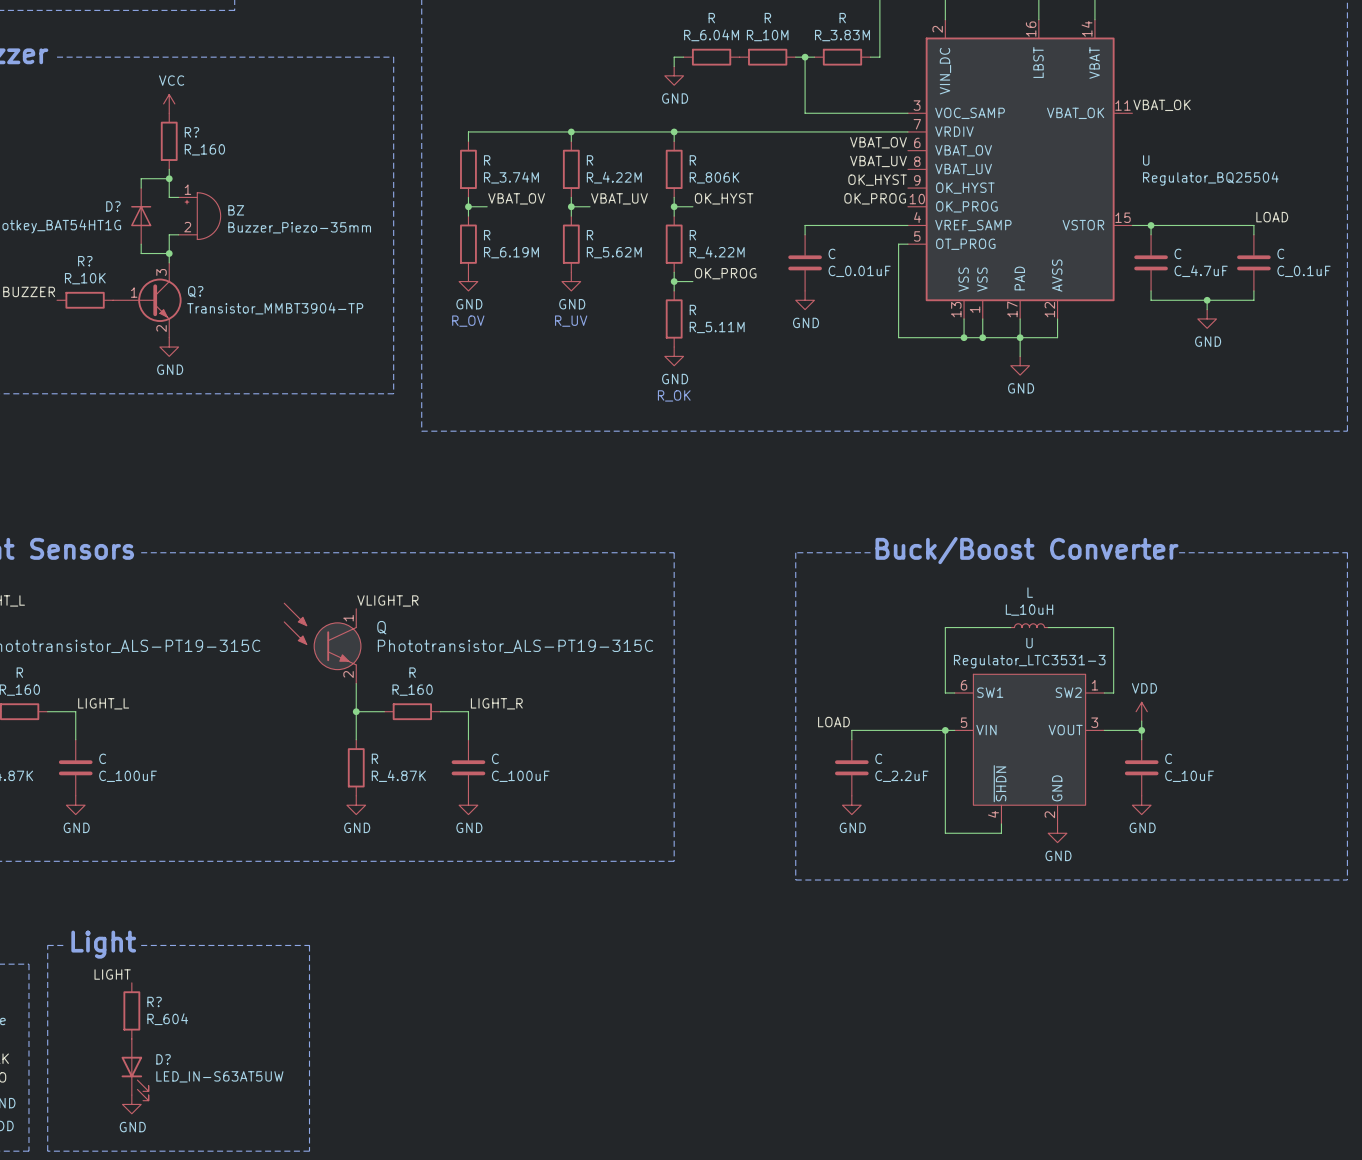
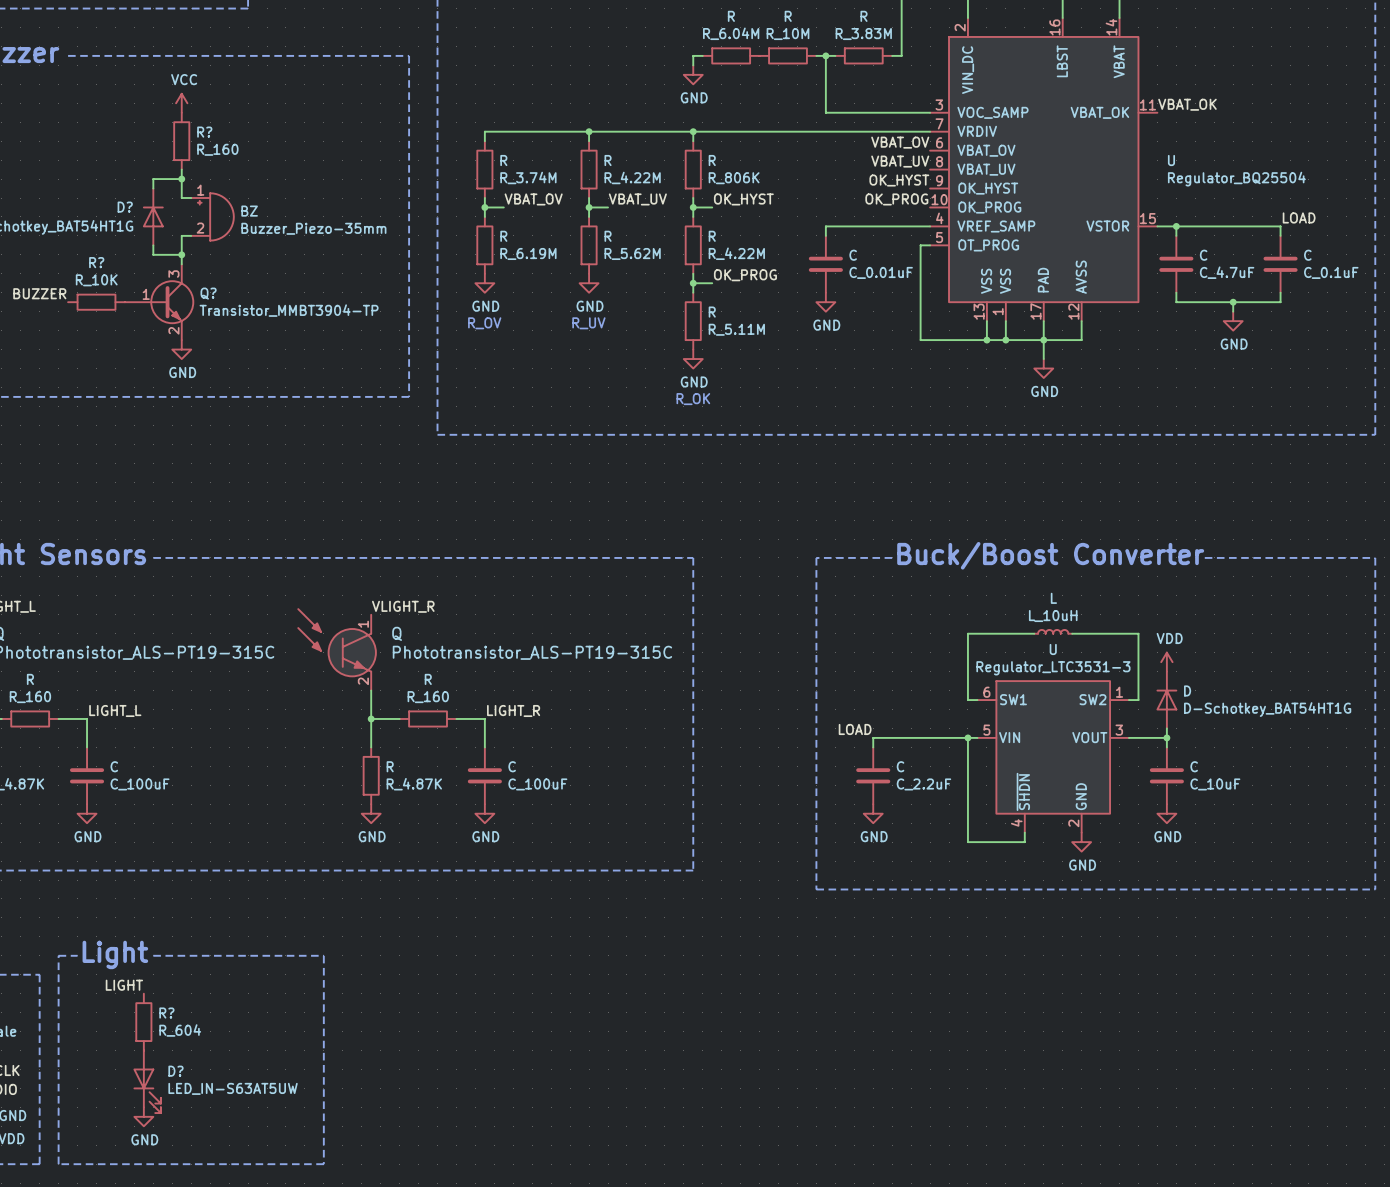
D: none -> D-Schotkey_BAT54HT1G (1166, 700)
power symbol position: VDD (1141, 711) -> VDD (1166, 662)

